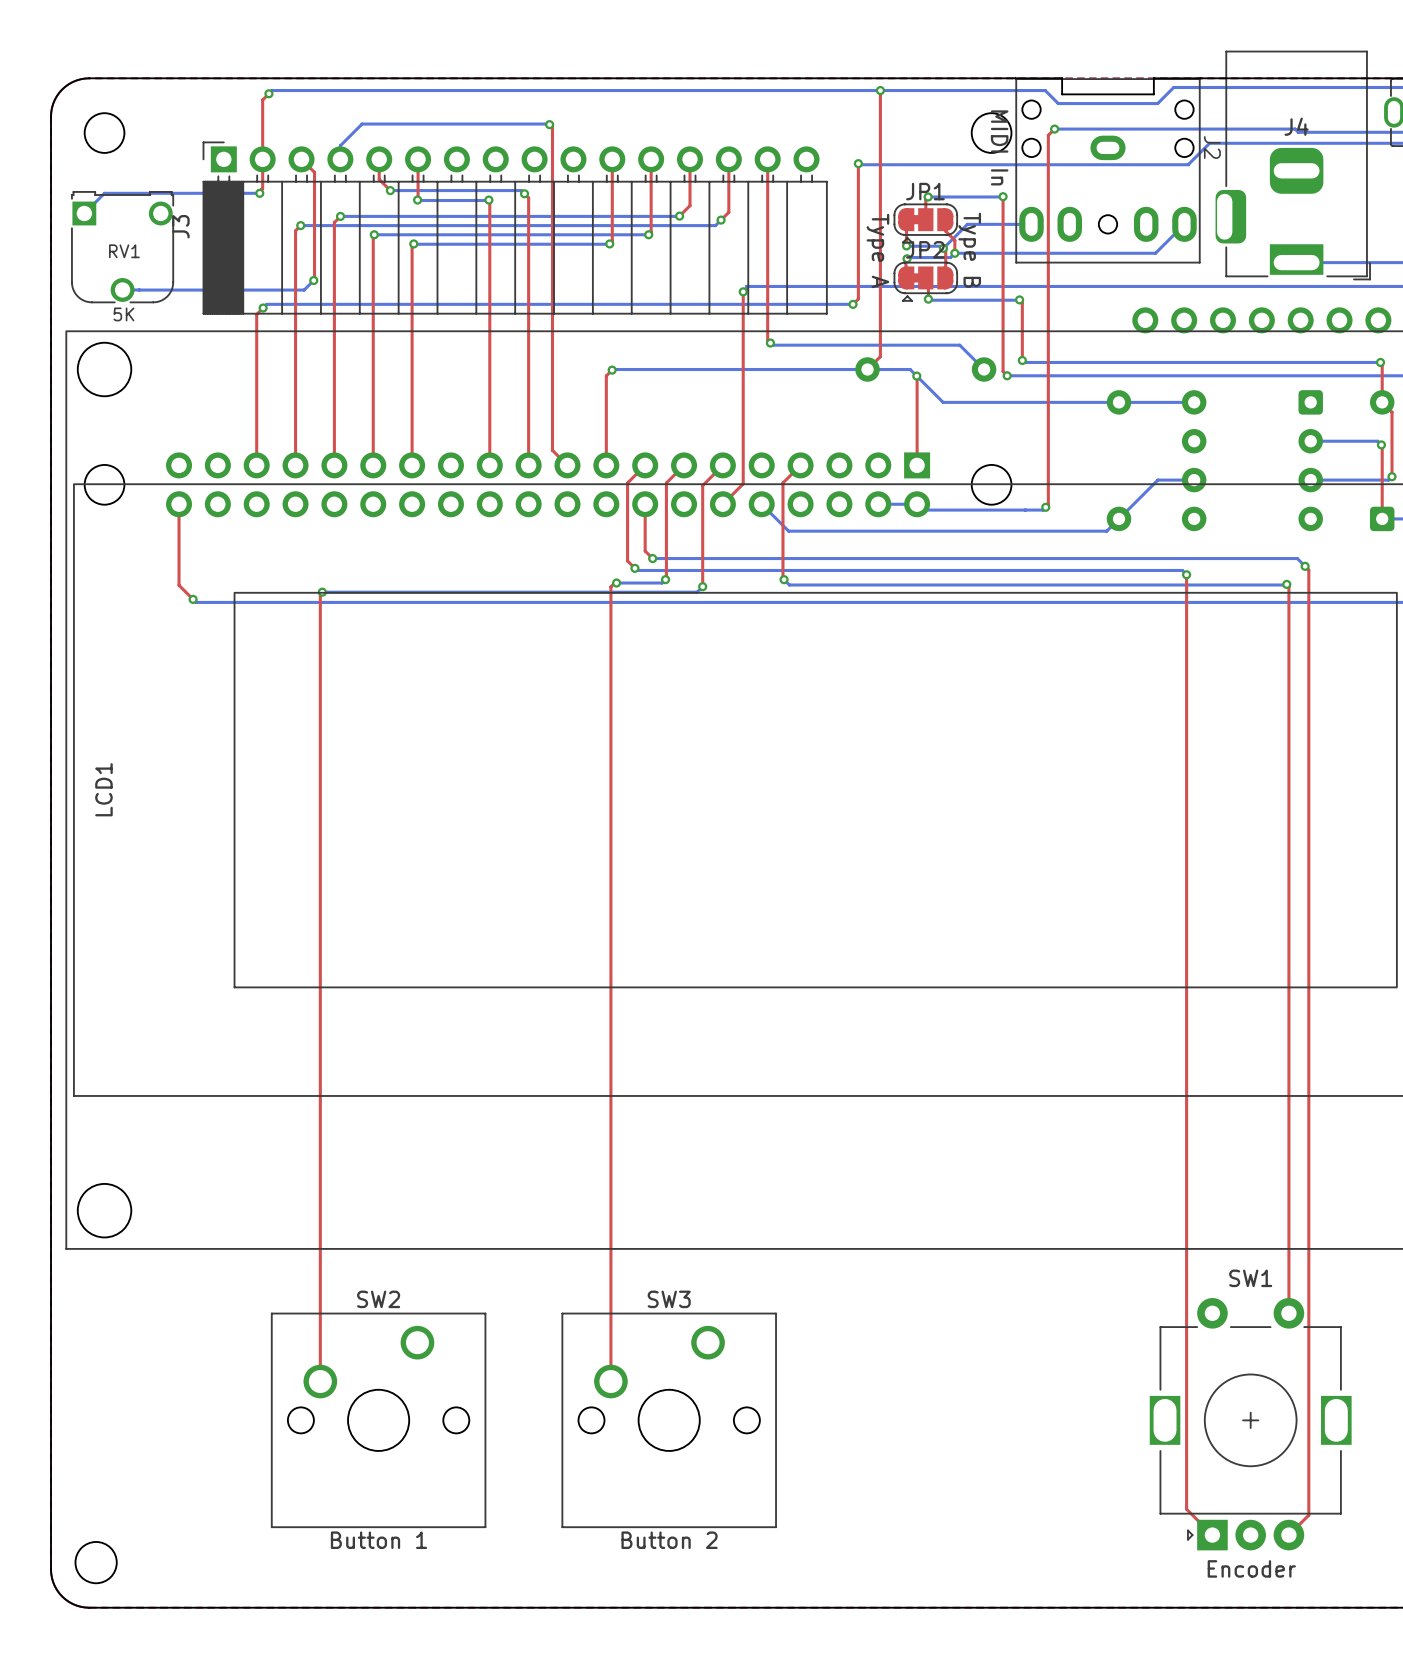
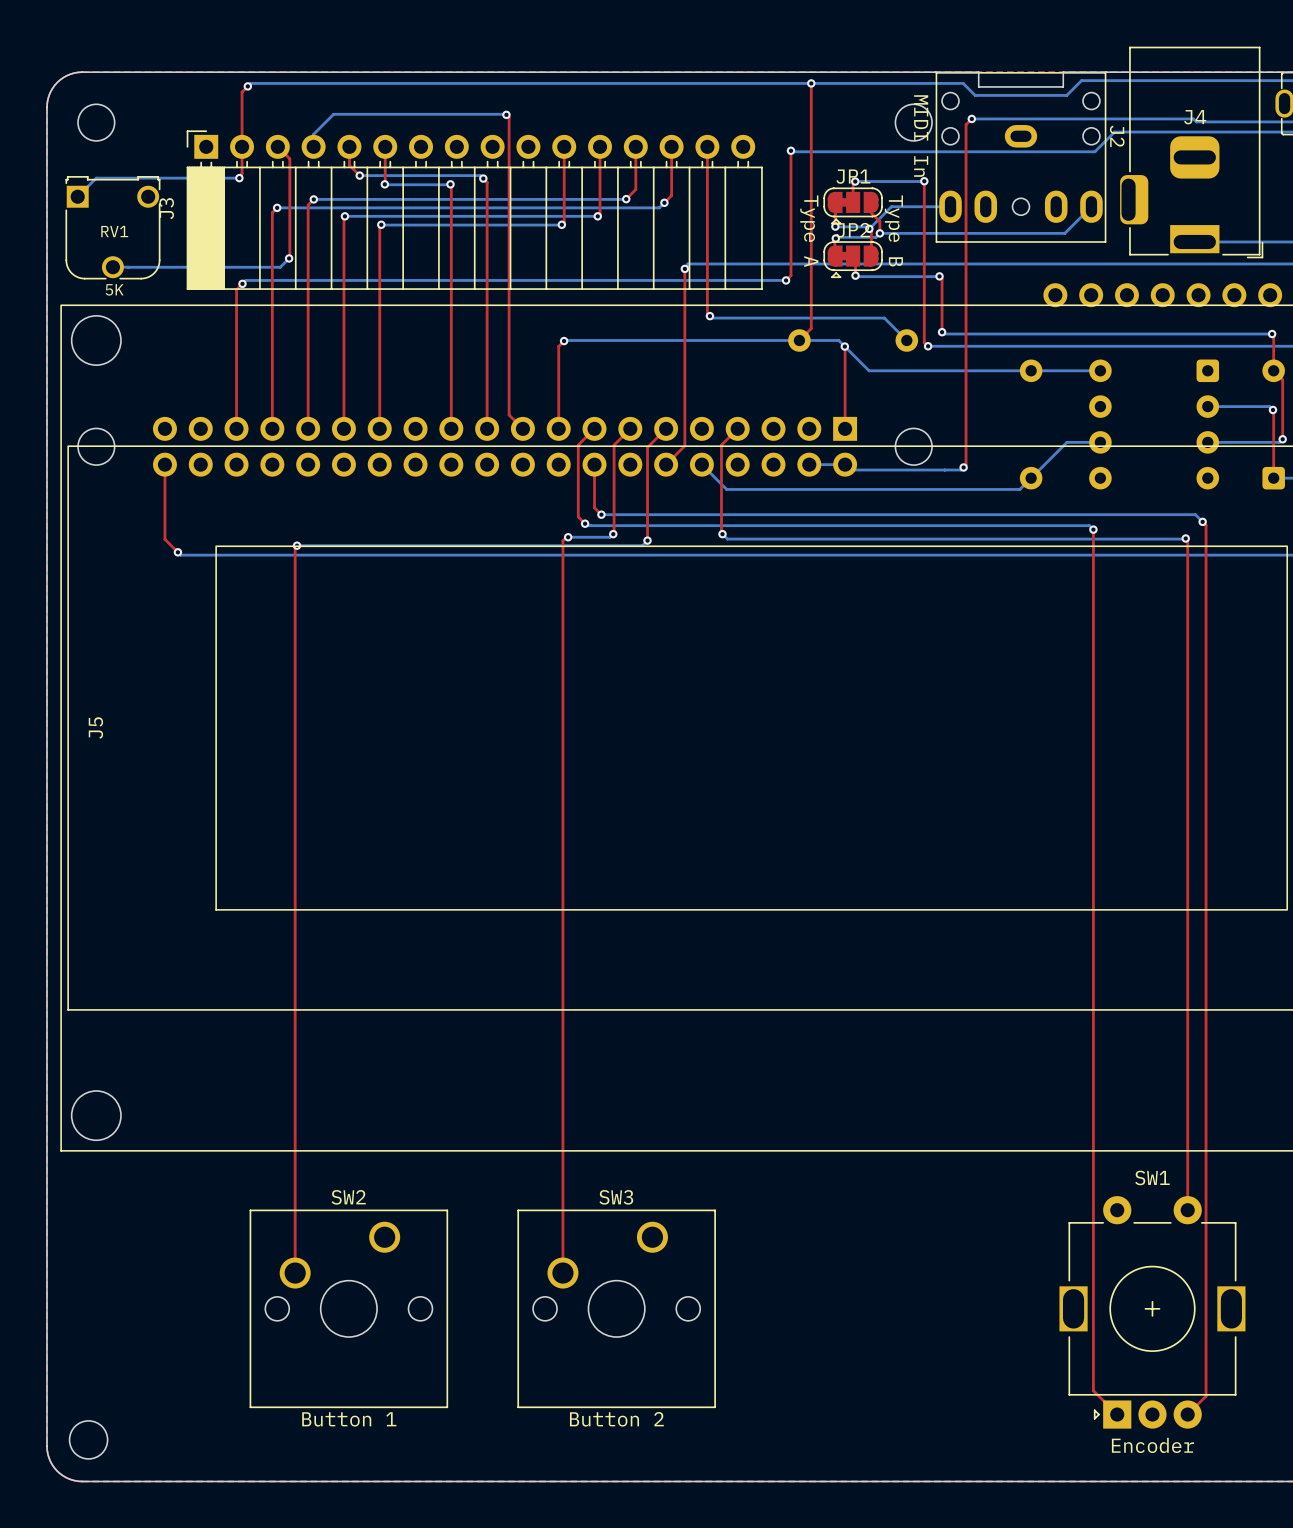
LCD1 name: LCD1 (103, 789) -> J5 (95, 727)

